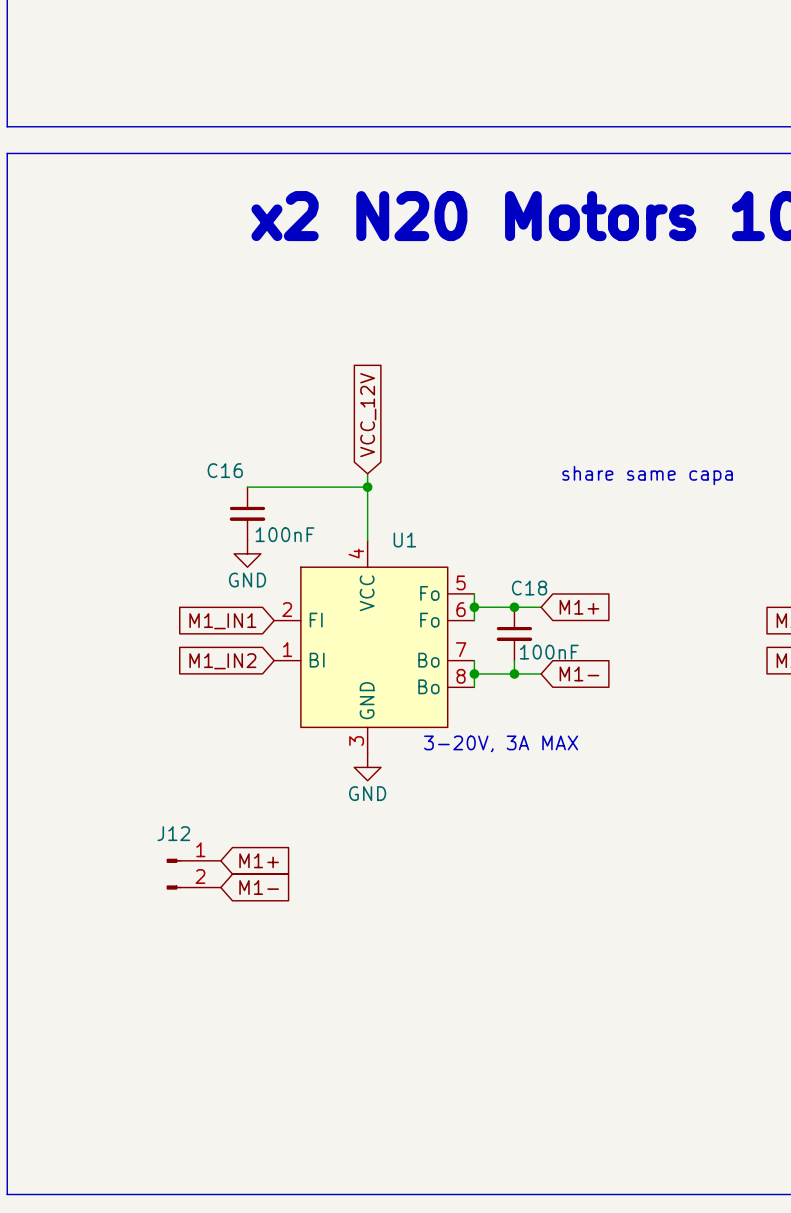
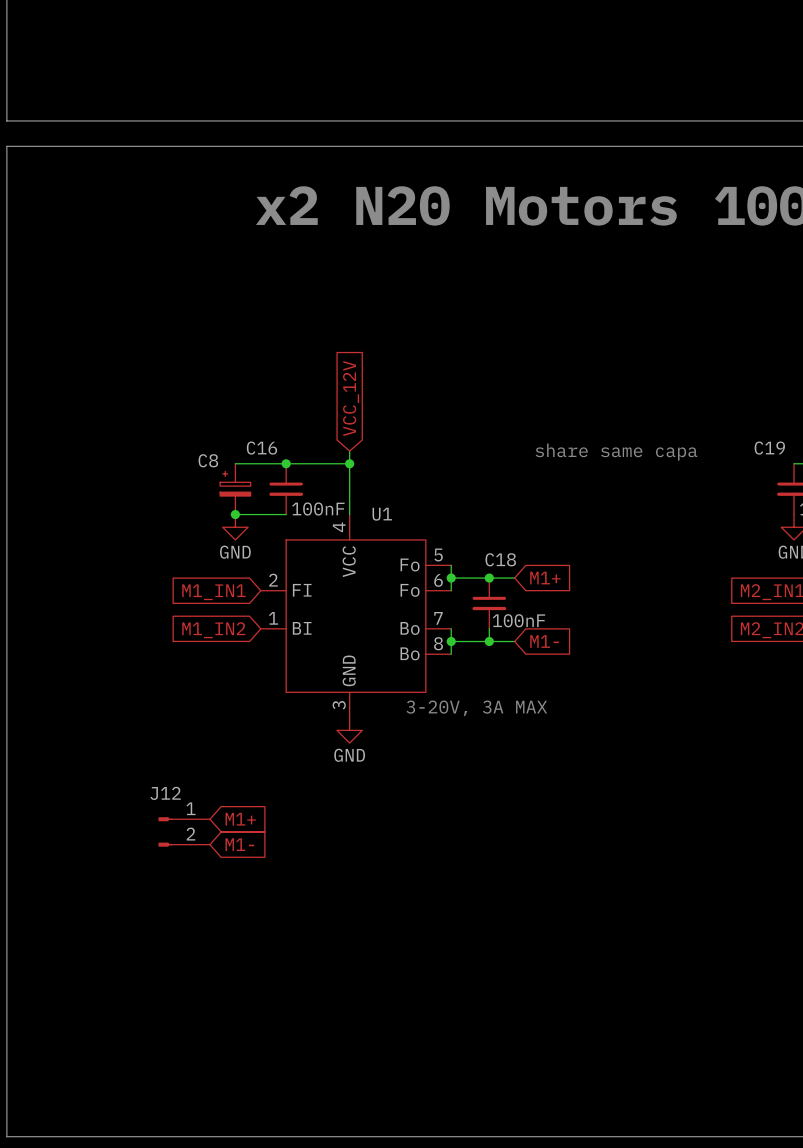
junction: none -> (286, 463)
C16 position: (247, 513) -> (286, 489)
C8: none -> (235, 489)
wire: none -> (235, 514) (286, 514)
junction: none -> (235, 514)

